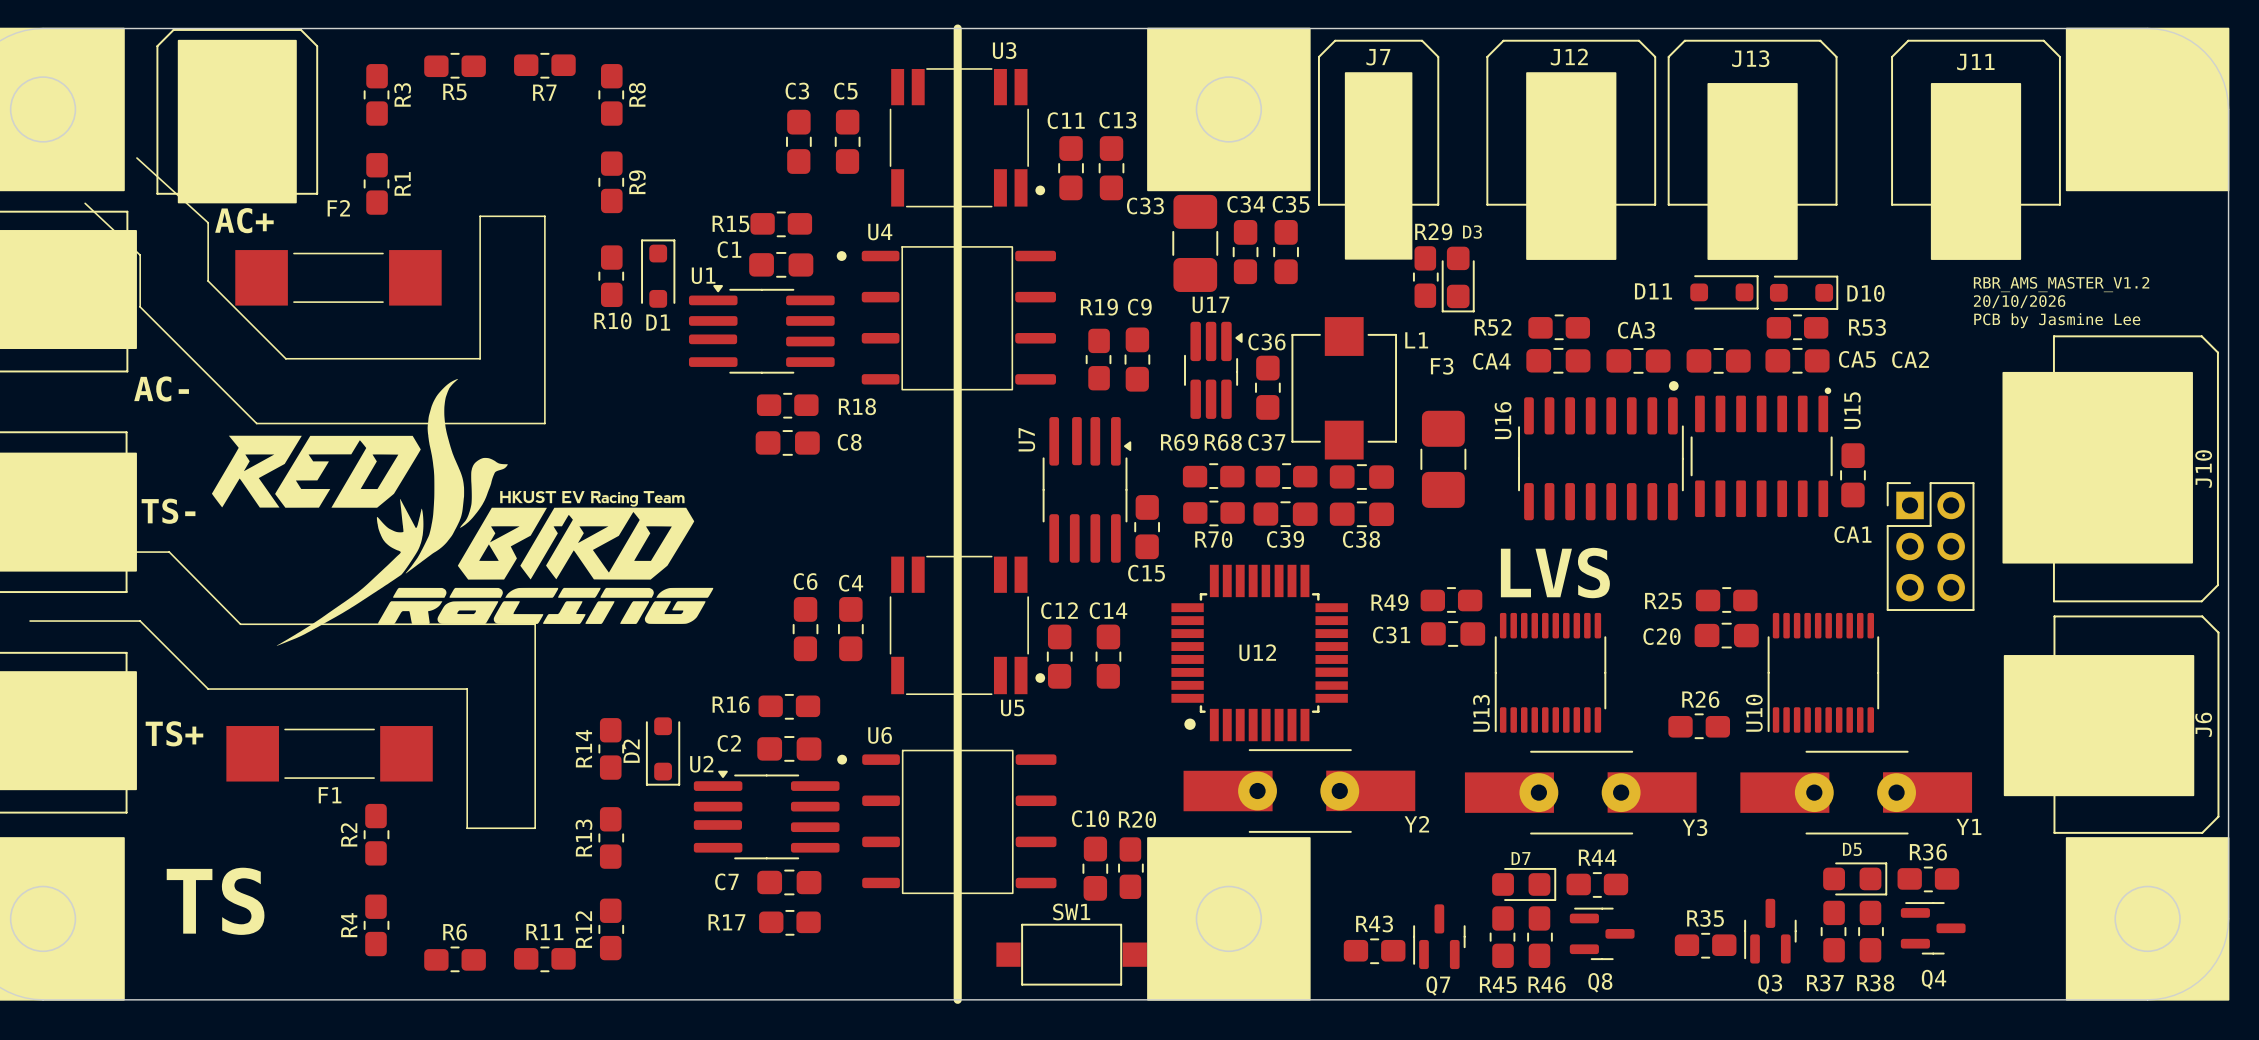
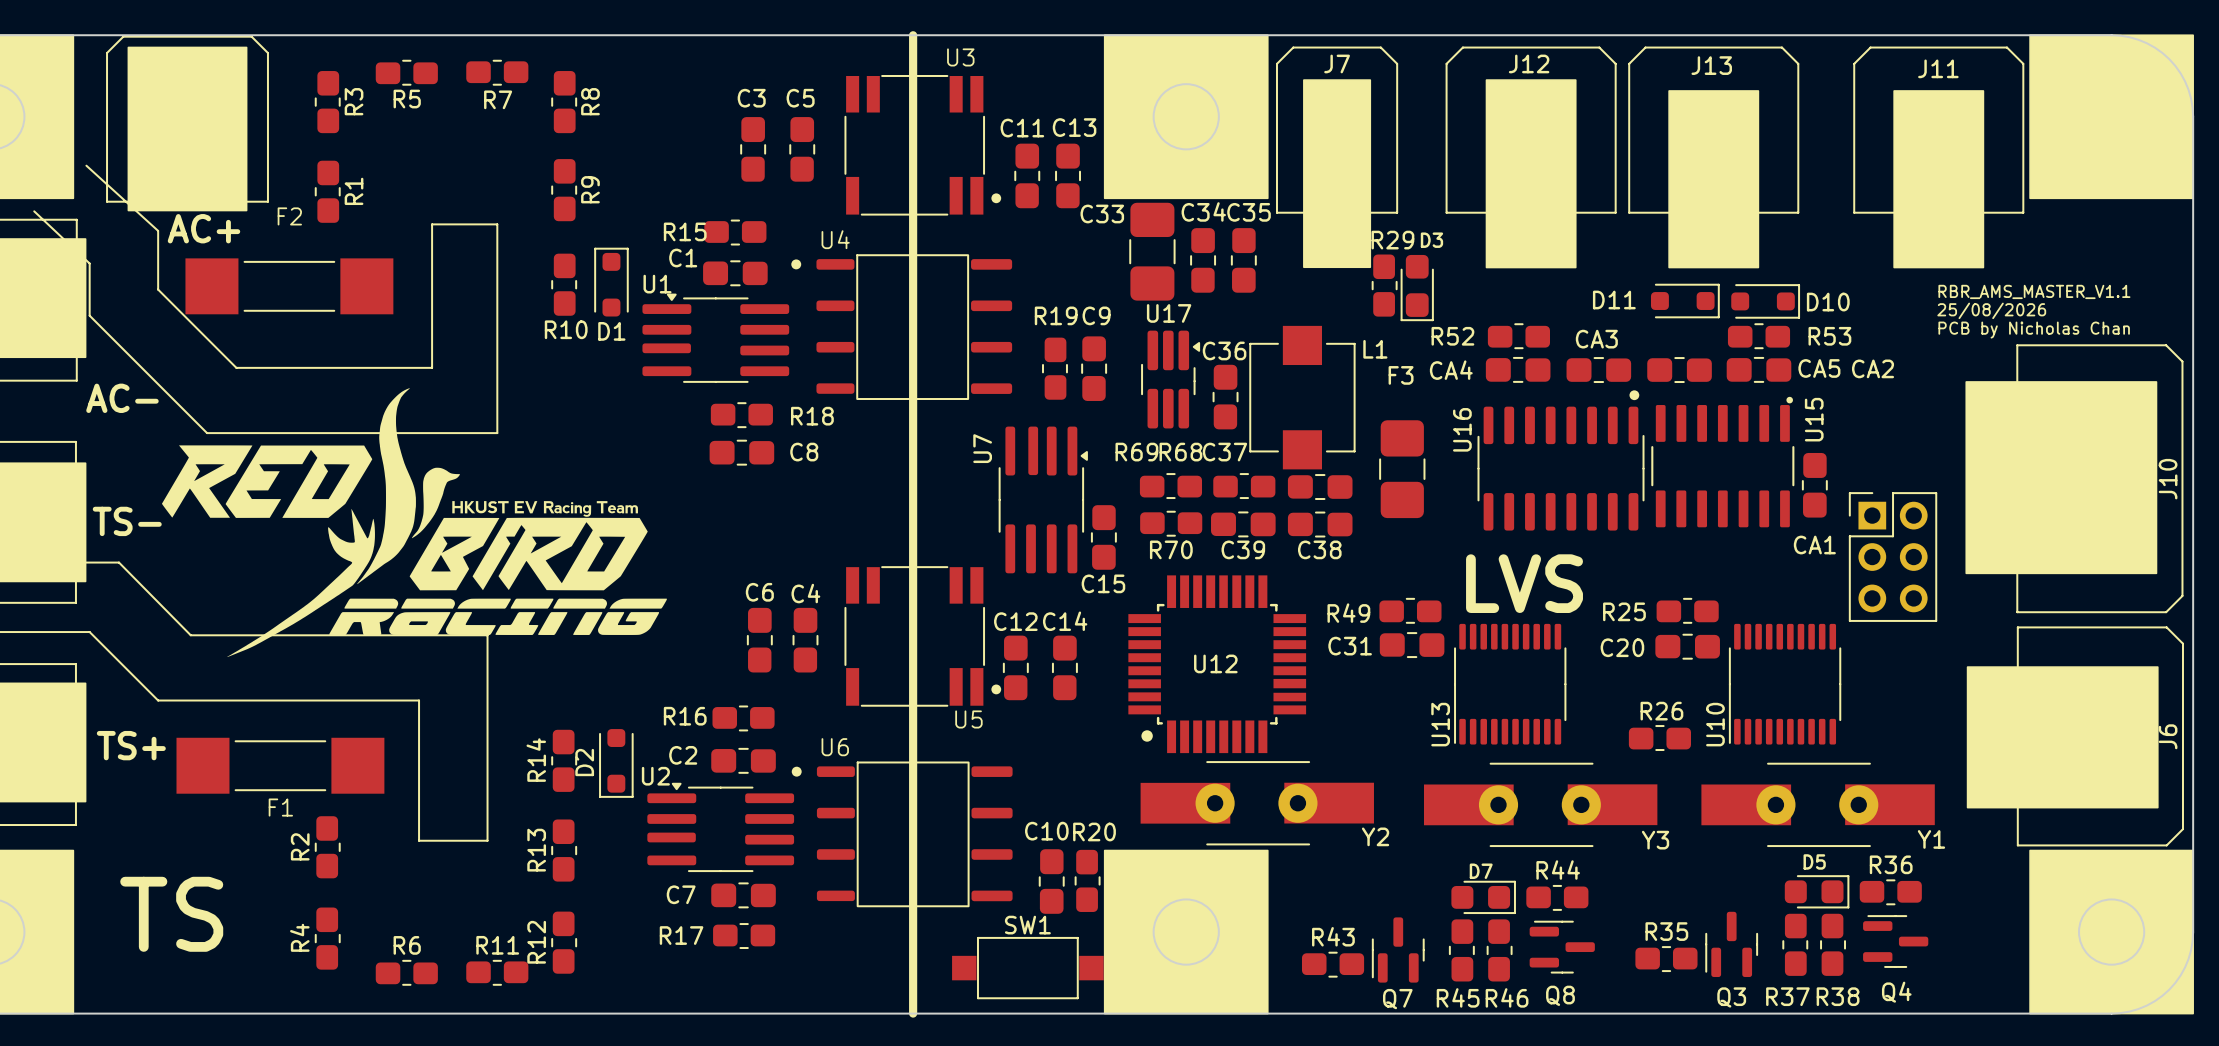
text: RBR_AMS_MASTER_V1.2 (2061, 284) -> RBR_AMS_MASTER_V1.1 (2034, 291)
text: 20/10/2026 (2019, 301) -> 25/08/2026 (1991, 310)
text: PCB by Jasmine Lee (2057, 320) -> PCB by Nicholas Chan (2034, 330)

